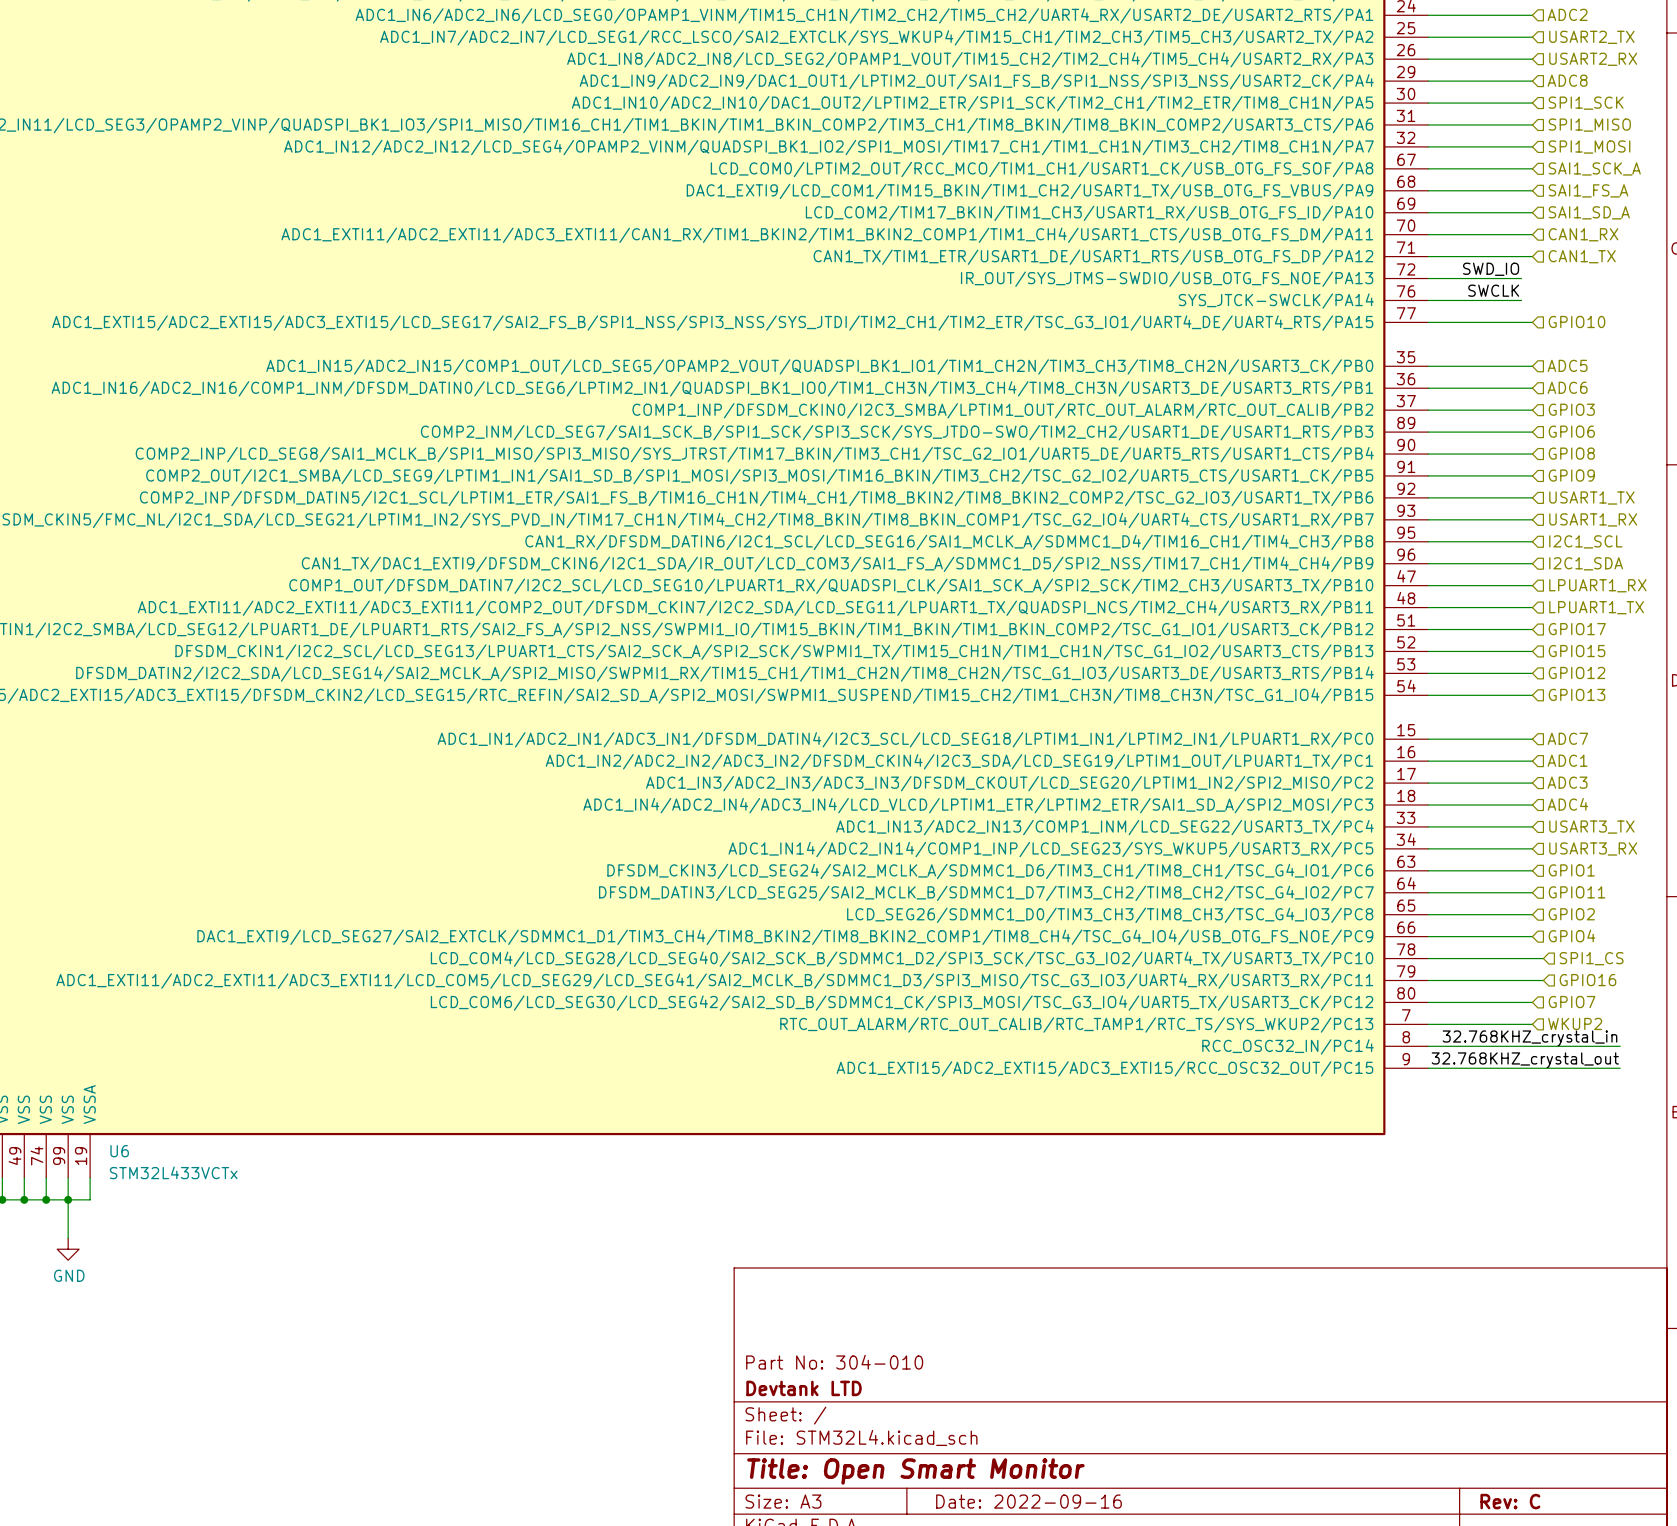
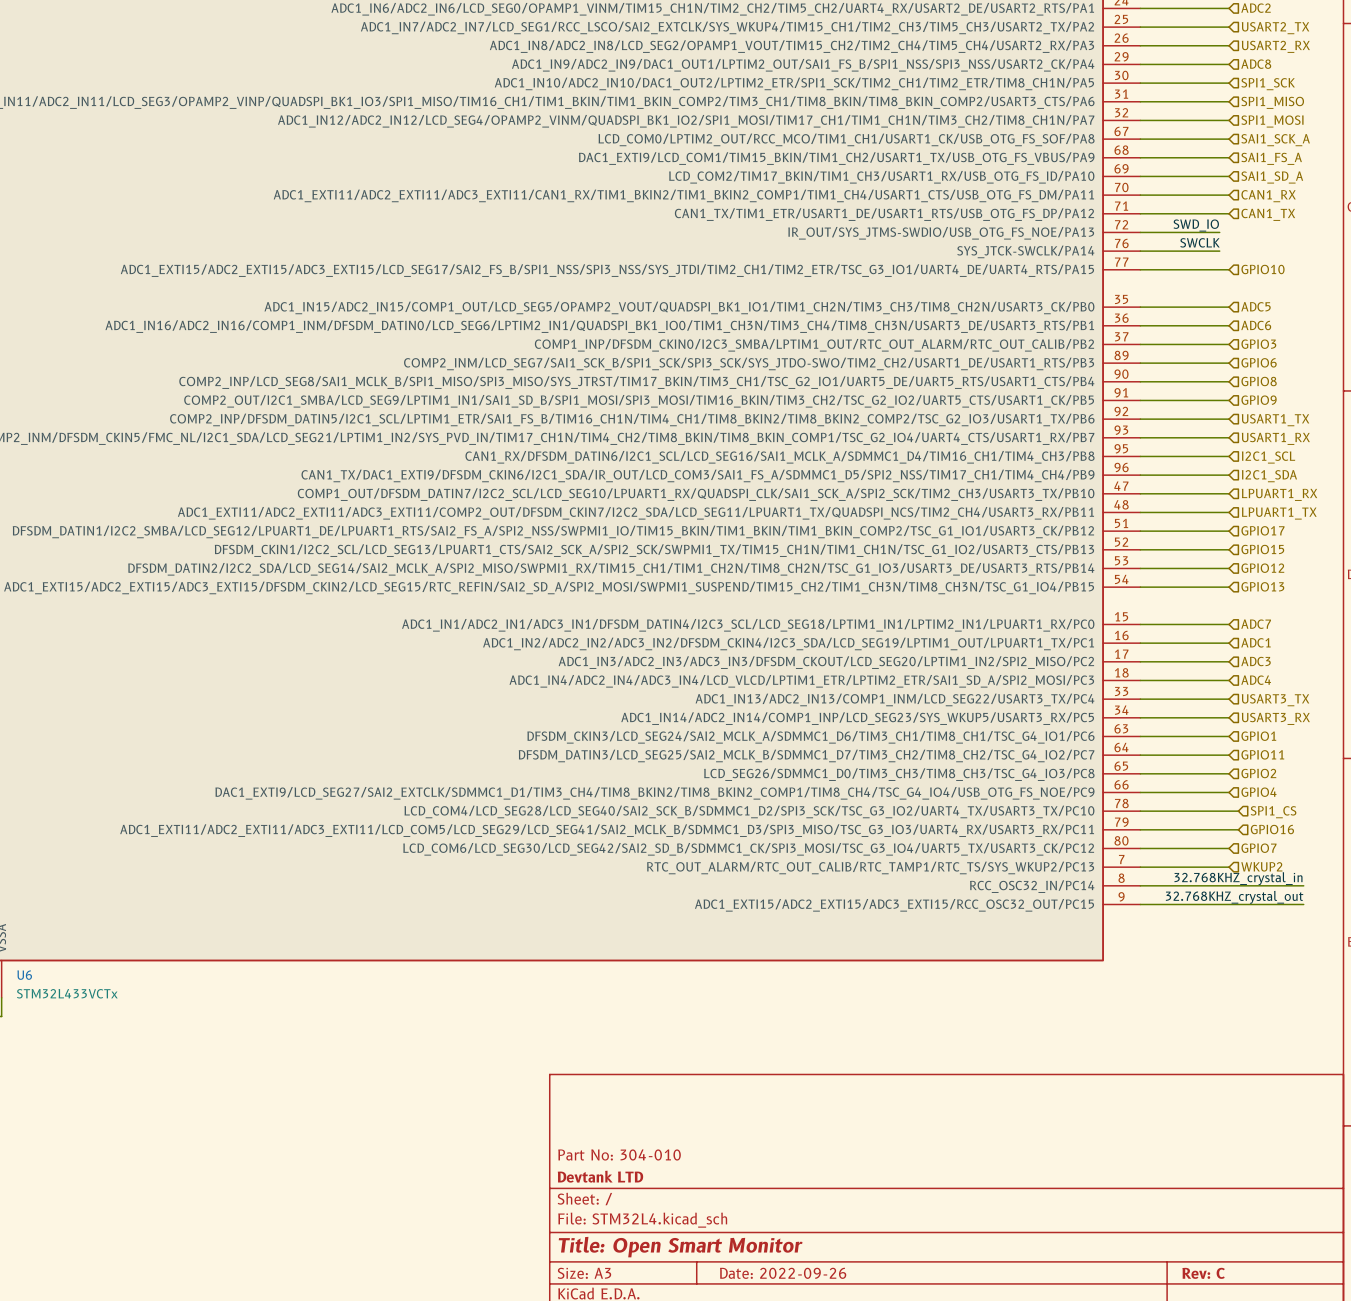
title block: Date: 2022-09-16 (1028, 1501) -> Date: 2022-09-26 (783, 1273)

